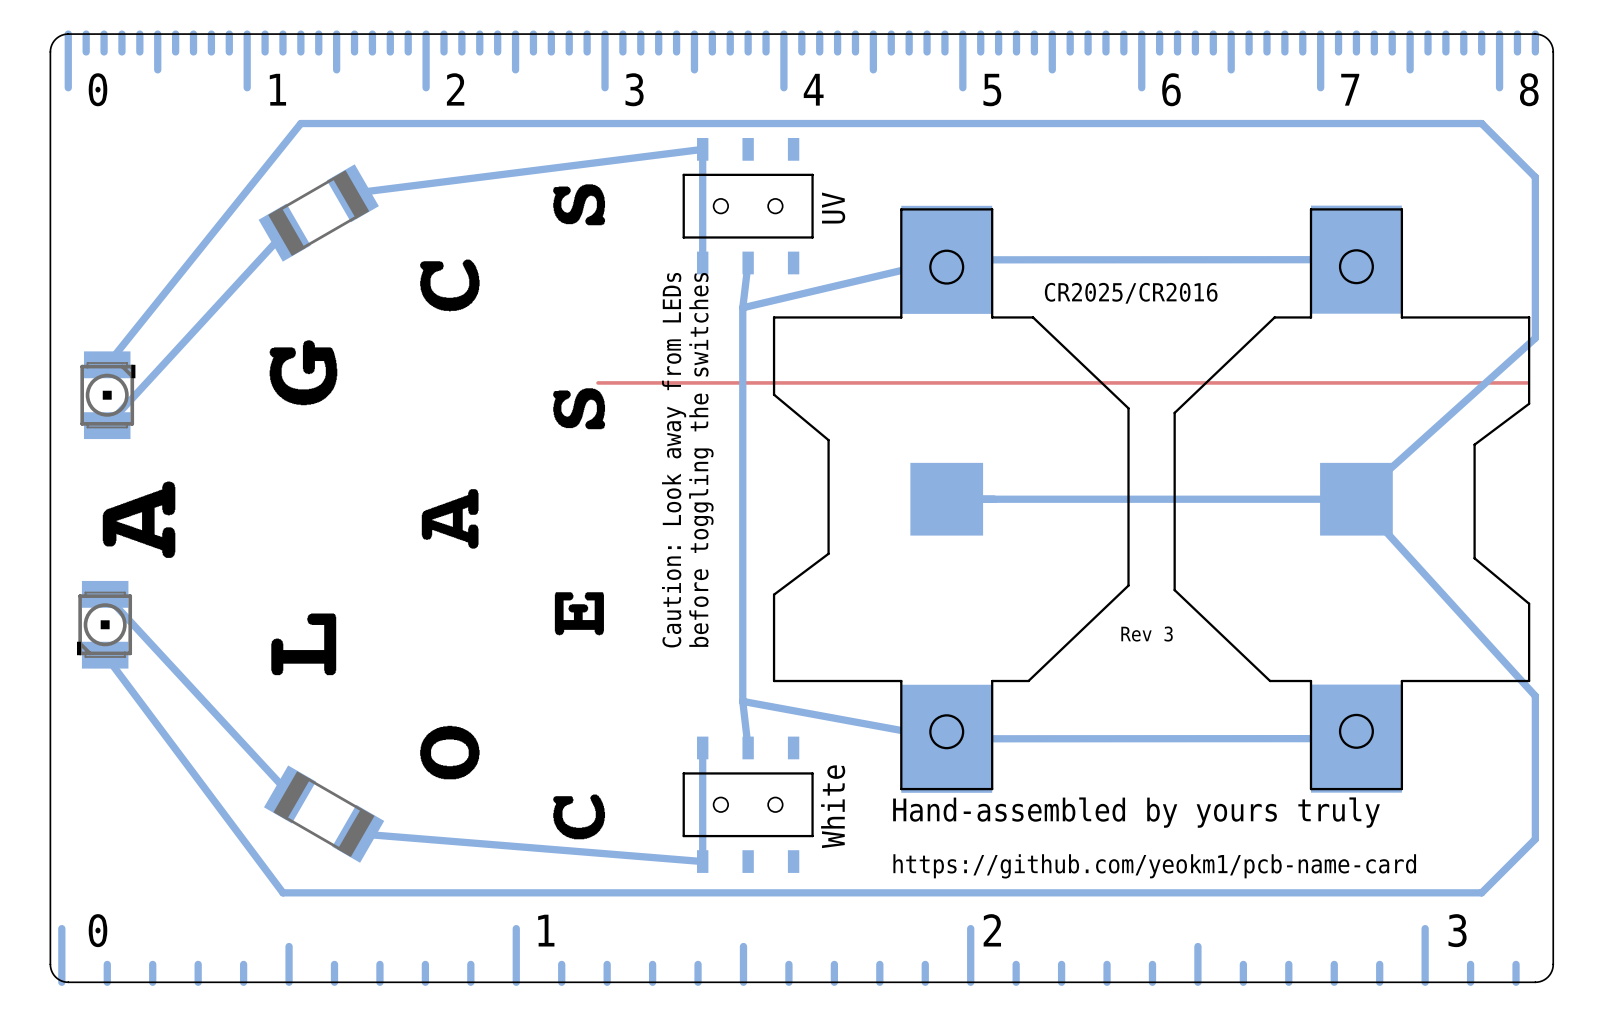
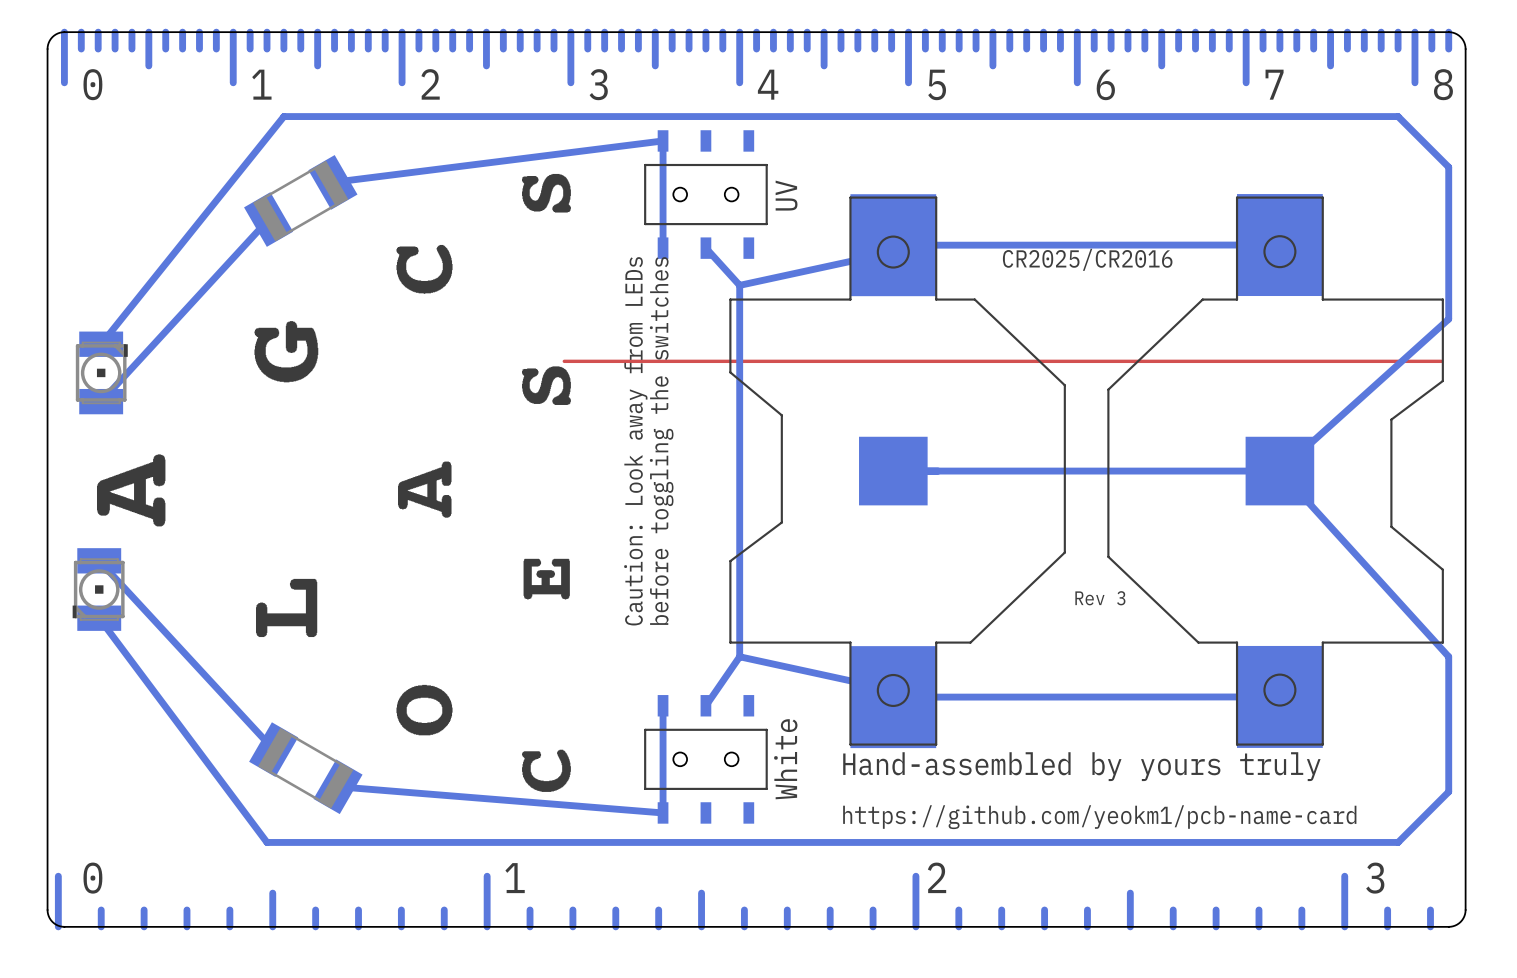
bottom track: (1356, 259) (946, 259) (742, 307) -> (1279, 245) (925, 245) (739, 285)
bottom track: (748, 262) (742, 307) -> (705, 248) (739, 285)
text position: CR2025/CR2016 (1131, 293) -> CR2025/CR2016 (1087, 259)
bottom track: (742, 307) (742, 701) -> (739, 285) (739, 656)
text position: Rev 3 (1147, 634) -> Rev 3 (1100, 598)
bottom track: (742, 701) (946, 738) (1356, 738) -> (739, 656) (925, 697) (1279, 696)
bottom track: (742, 701) (748, 747) -> (739, 656) (705, 705)

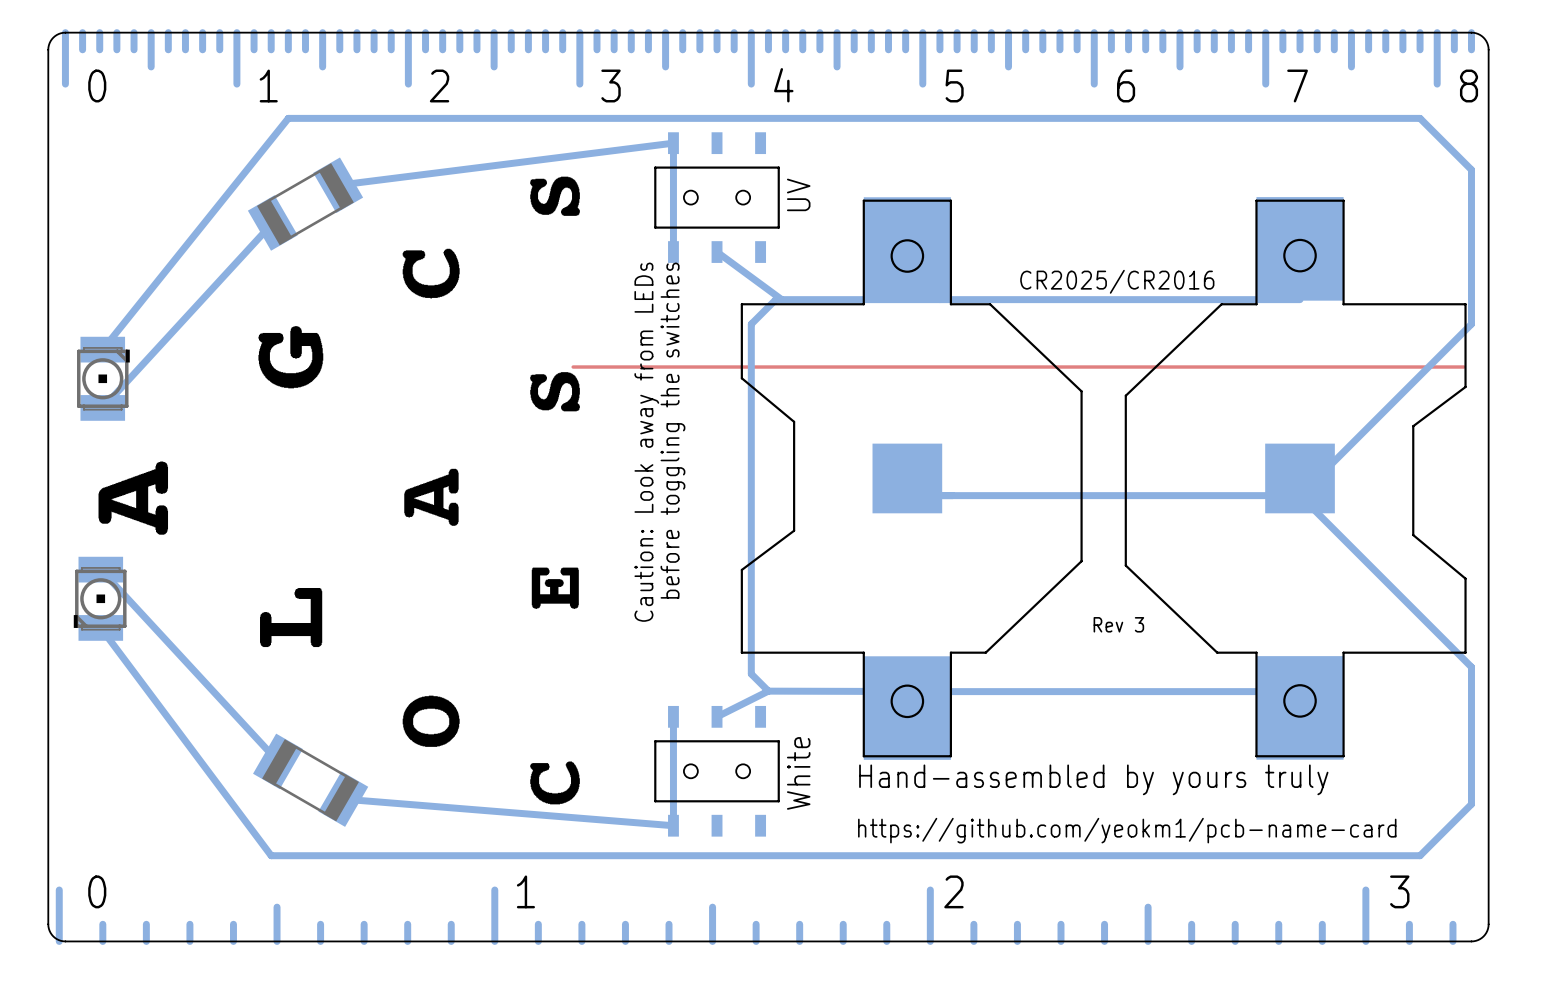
bottom track: (1279, 245) (925, 245) (739, 285) -> none
bottom track: (705, 248) (739, 285) -> (717, 252) (781, 299)
text position: CR2025/CR2016 (1087, 259) -> CR2025/CR2016 (1117, 281)
bottom track: (739, 285) (739, 319) -> (1300, 299) (775, 299) (751, 324)
bottom track: (1448, 319) (1279, 471) -> (1471, 324) (1300, 495)
bottom track: (1279, 471) (1448, 656) -> (1300, 495) (1471, 667)
bottom track: (1279, 471) (925, 471) -> (1300, 495) (939, 495)
text position: Rev 3 (1100, 598) -> Rev 3 (1118, 624)
bottom track: none -> (751, 667) (751, 674) (768, 691)
bottom track: none -> (768, 691) (1300, 691)
bottom track: (1279, 696) (925, 697) (739, 656) (705, 705) -> (768, 691) (717, 716)

